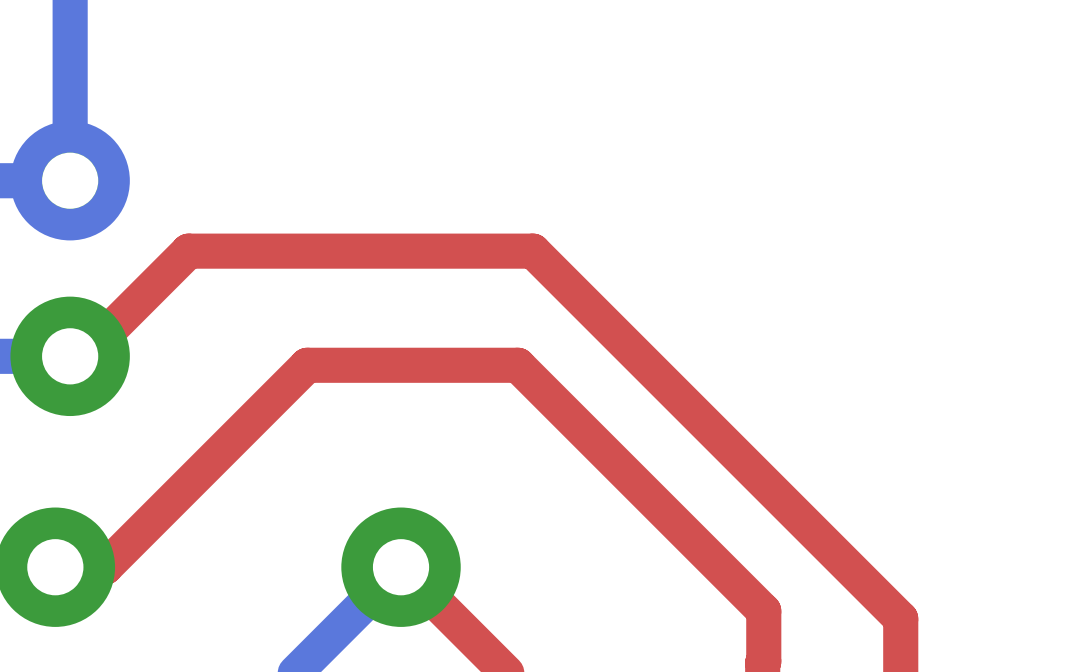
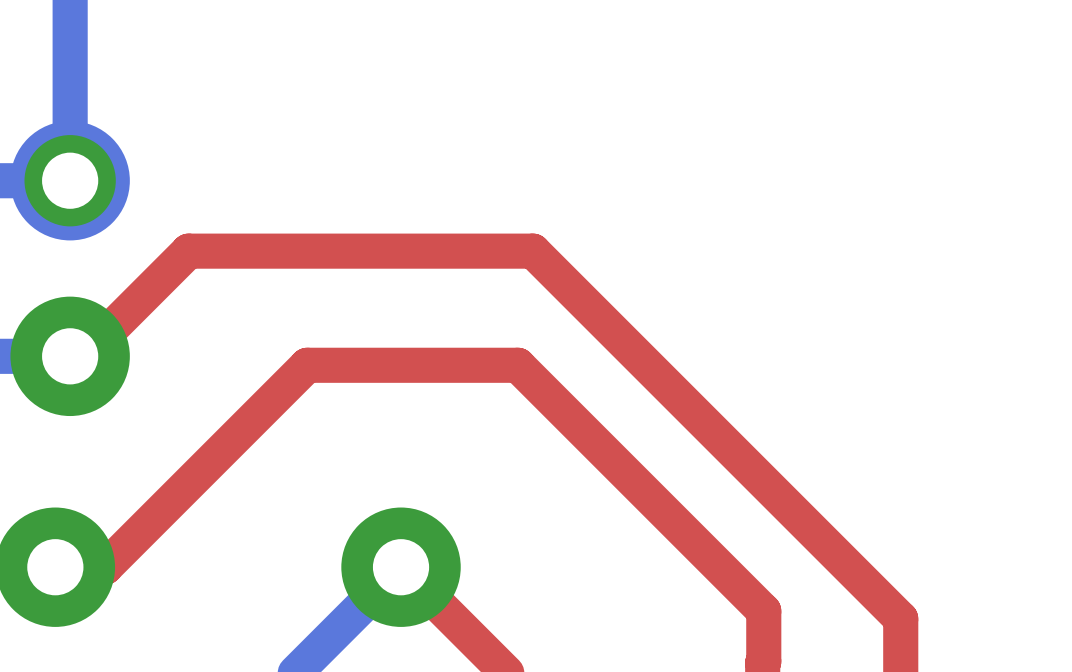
part footprint: [10, 121, 130, 417] -> [10, 121, 130, 417]

